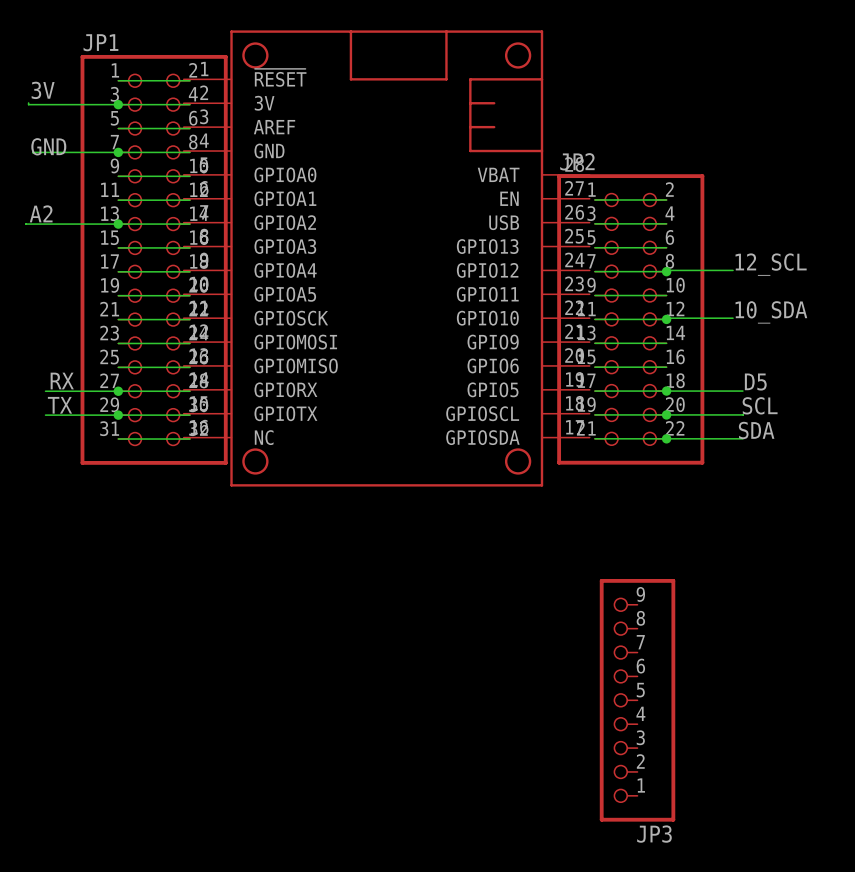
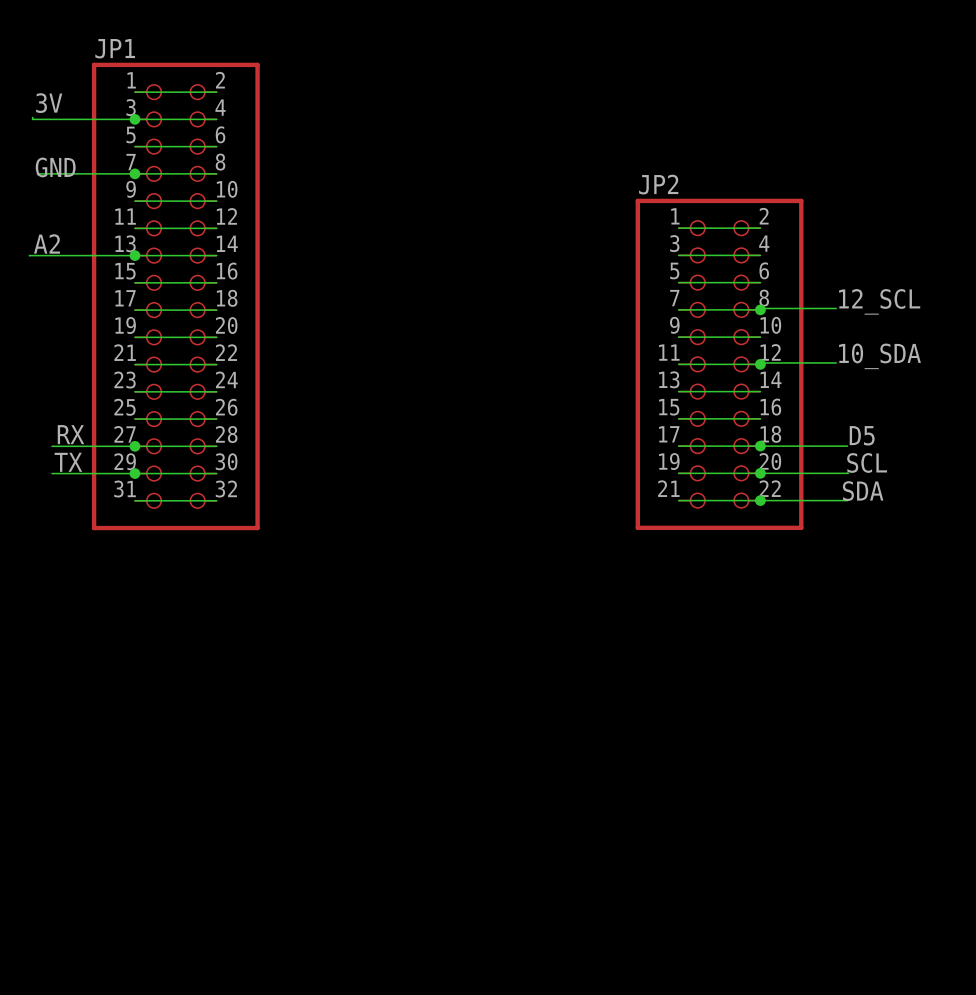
part: (386, 258) -> none
JP3: (637, 700) -> none

